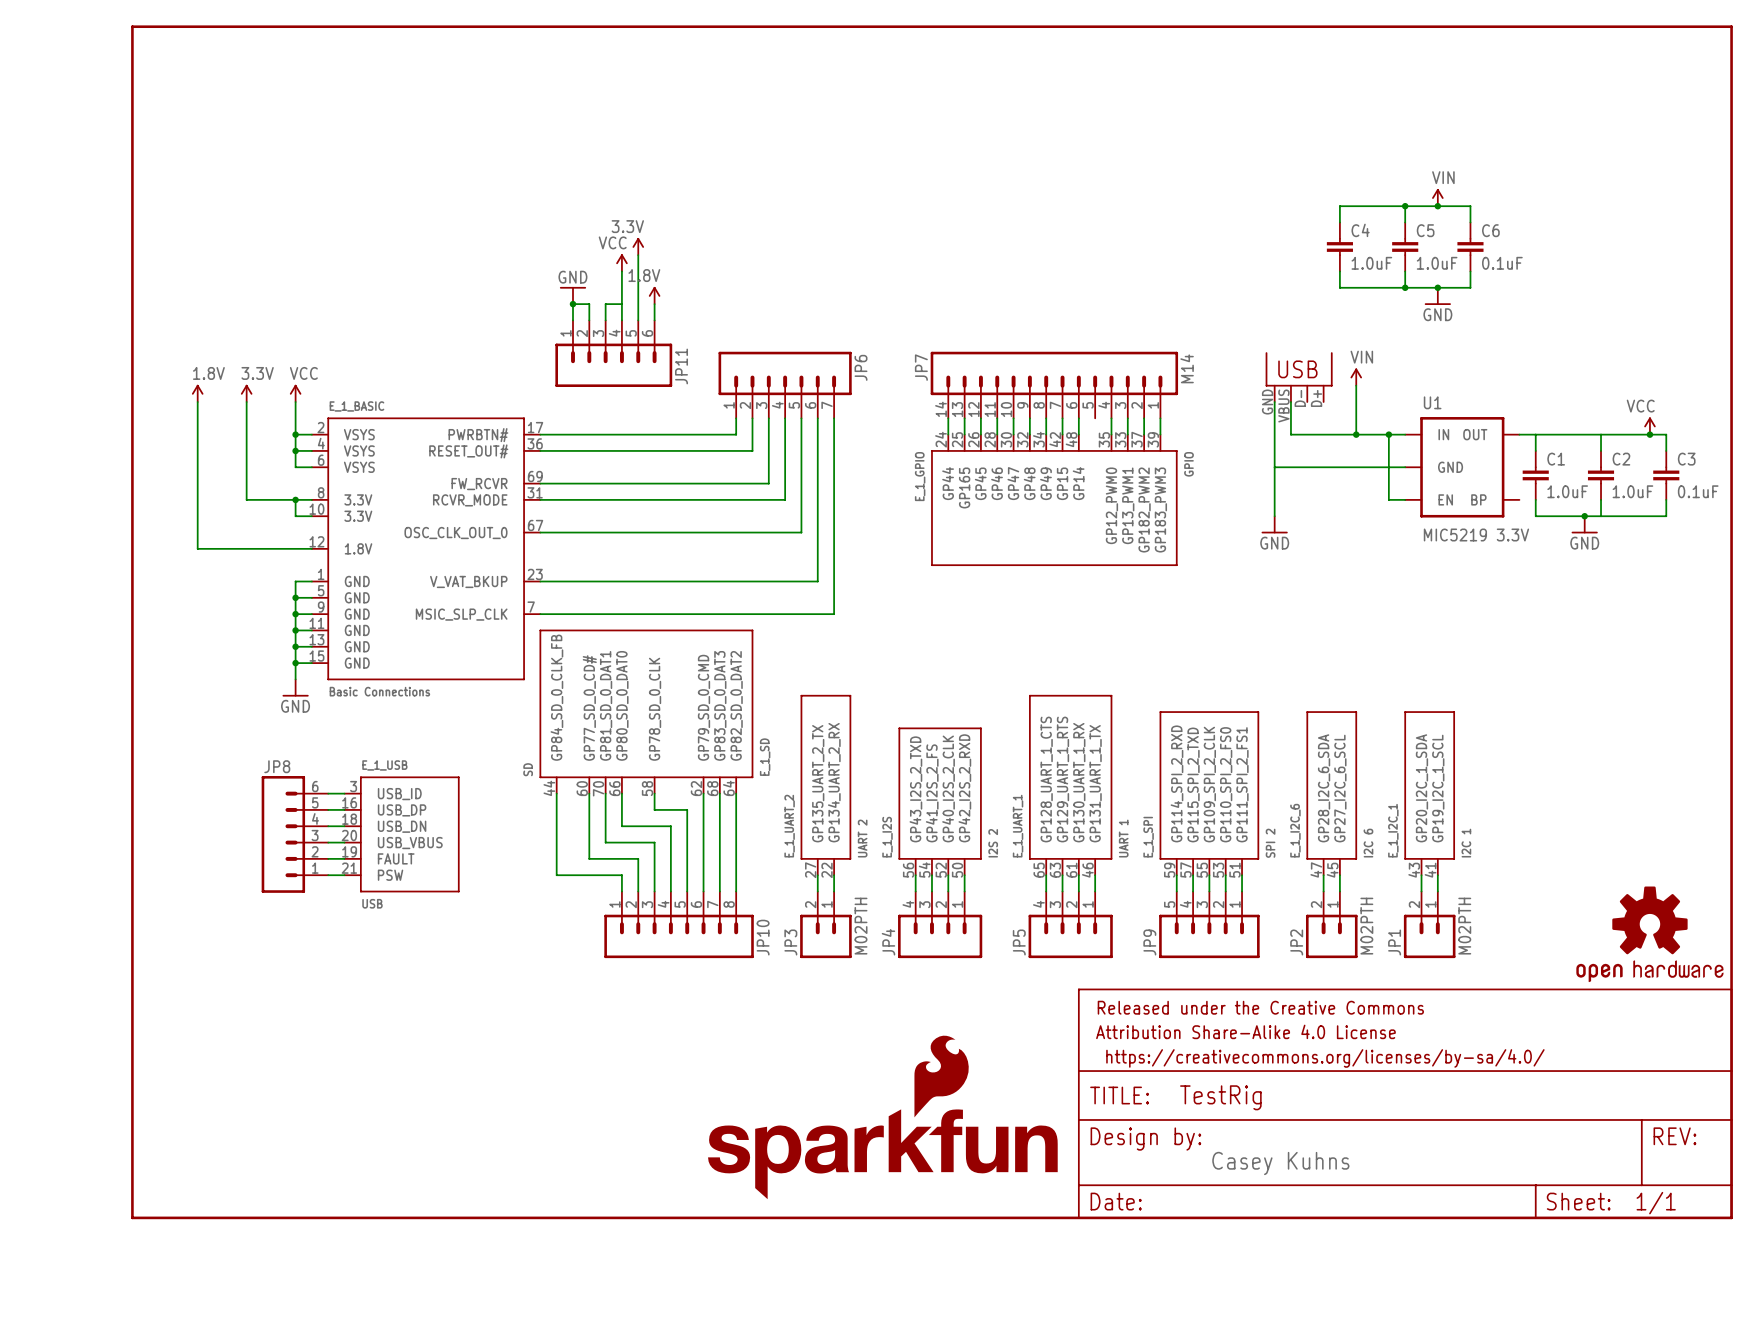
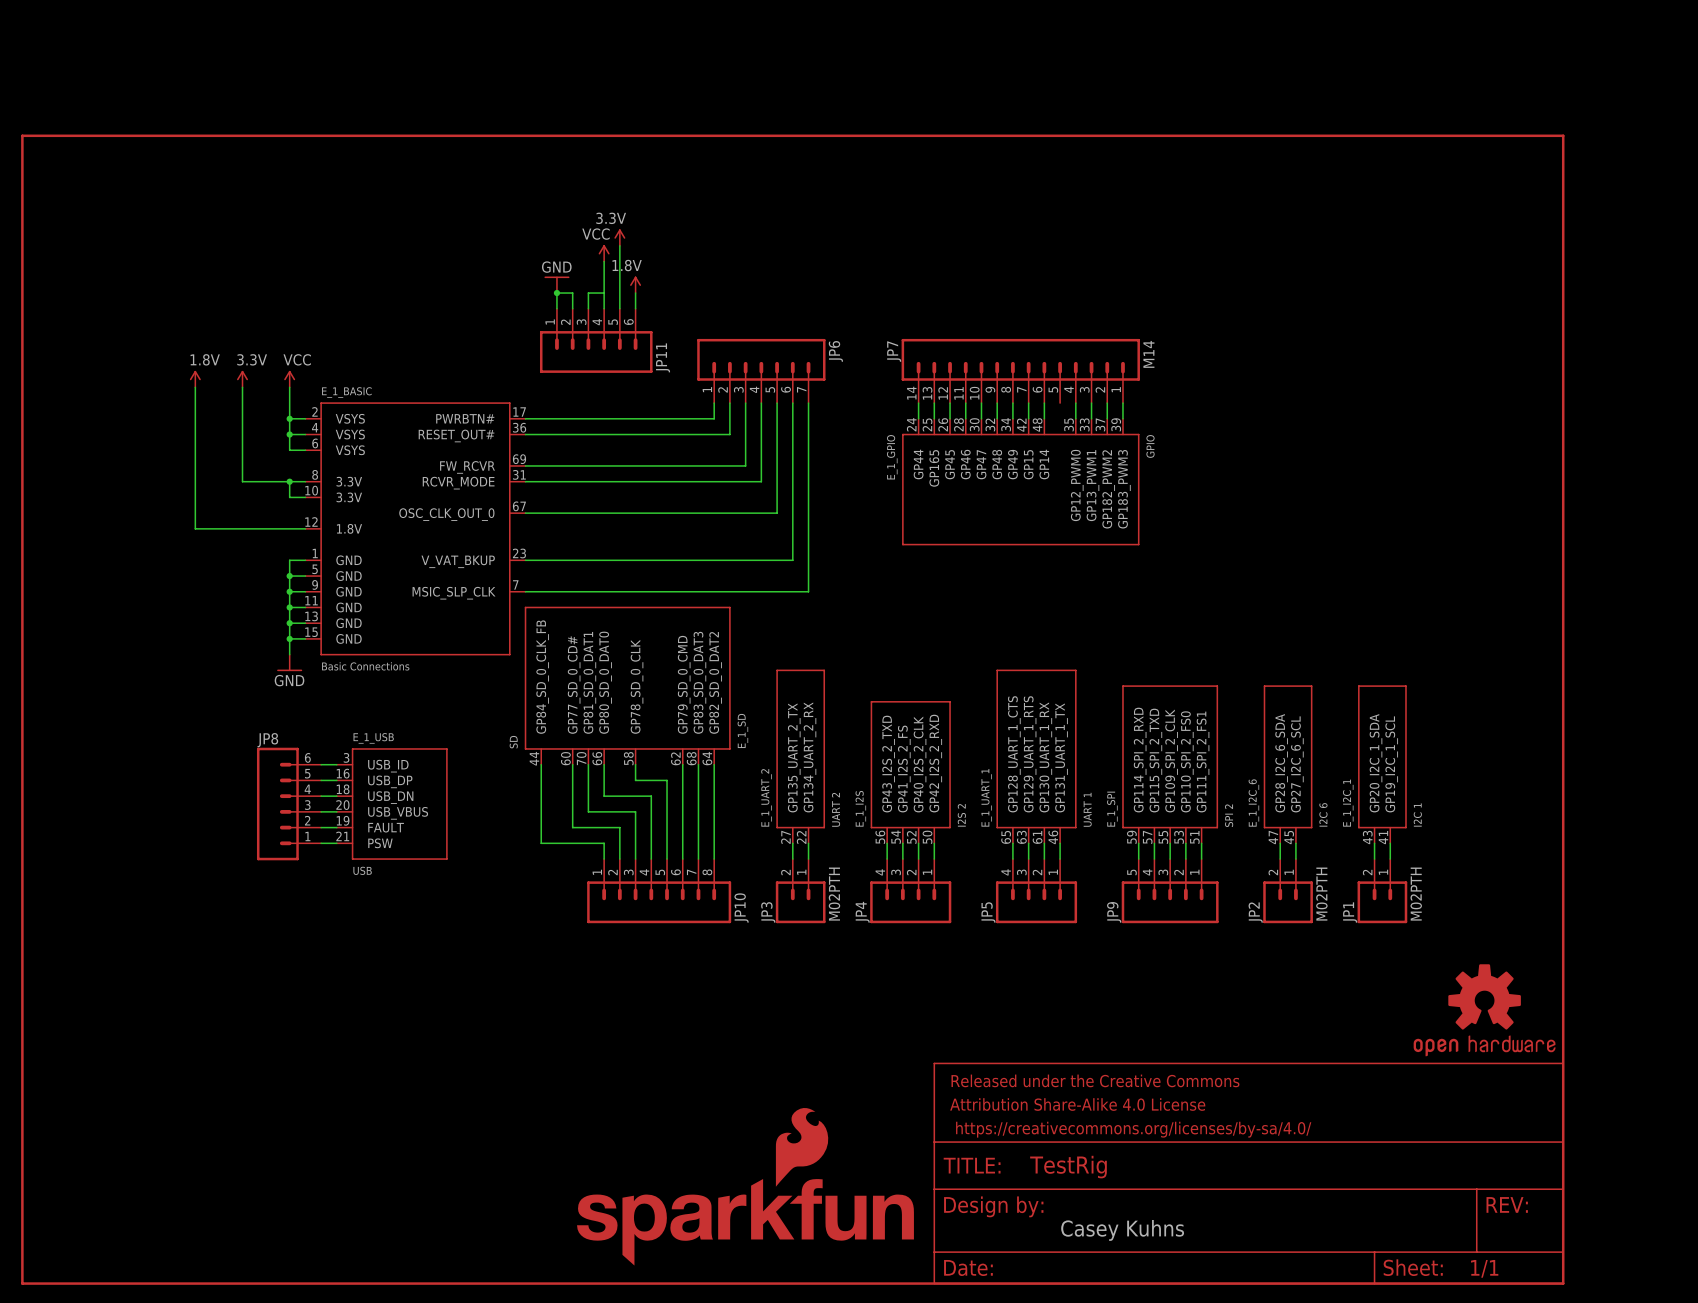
power symbol: VIN (1437, 197) -> none
wire: (1405, 206) (1405, 222) -> none
junction: (1405, 206) -> none
junction: (1437, 206) -> none
wire: (1339, 222) (1339, 206) (1470, 206) (1470, 222) -> none
C4: 1.0uF (1339, 246) -> none
C5: 1.0uF (1405, 246) -> none
C6: 0.1uF (1470, 246) -> none
wire: (1339, 271) (1339, 287) (1470, 287) (1470, 271) -> none
wire: (1405, 271) (1405, 287) -> none
junction: (1405, 287) -> none
junction: (1437, 287) -> none
power symbol: GND (1437, 296) -> none
part: (1299, 377) -> none
power symbol: VIN (1356, 377) -> none
wire: (1356, 385) (1356, 434) -> none
wire: (1274, 402) (1274, 516) -> none
wire: (1290, 402) (1290, 434) (1405, 434) -> none
power symbol: VCC (1649, 426) -> none
junction: (1356, 434) -> none
wire: (1388, 434) (1388, 499) (1405, 499) -> none
junction: (1388, 434) -> none
wire: (1519, 434) (1666, 434) (1666, 450) -> none
wire: (1535, 434) (1535, 450) -> none
wire: (1601, 434) (1601, 450) -> none
junction: (1649, 434) -> none
wire: (1274, 467) (1405, 467) -> none
U1: MIC5219 3.3V (1462, 467) -> none
C1: 1.0uF (1535, 475) -> none
C2: 1.0uF (1601, 475) -> none
C3: 0.1uF (1666, 475) -> none
wire: (1535, 499) (1535, 516) (1666, 516) (1666, 499) -> none
wire: (1601, 499) (1601, 516) -> none
junction: (1584, 516) -> none
power symbol: GND (1274, 524) -> none
power symbol: GND (1584, 524) -> none
part: (931, 622) -> none
part: none -> (792, 709)
part: (1649, 934) -> none
part: none -> (1484, 1010)
part: (1405, 1103) -> none
part: (882, 1117) -> none
text: Casey Kuhns (1280, 1163) -> none
part: none -> (1248, 1173)
part: none -> (745, 1186)
text: none -> Casey Kuhns (1122, 1230)

